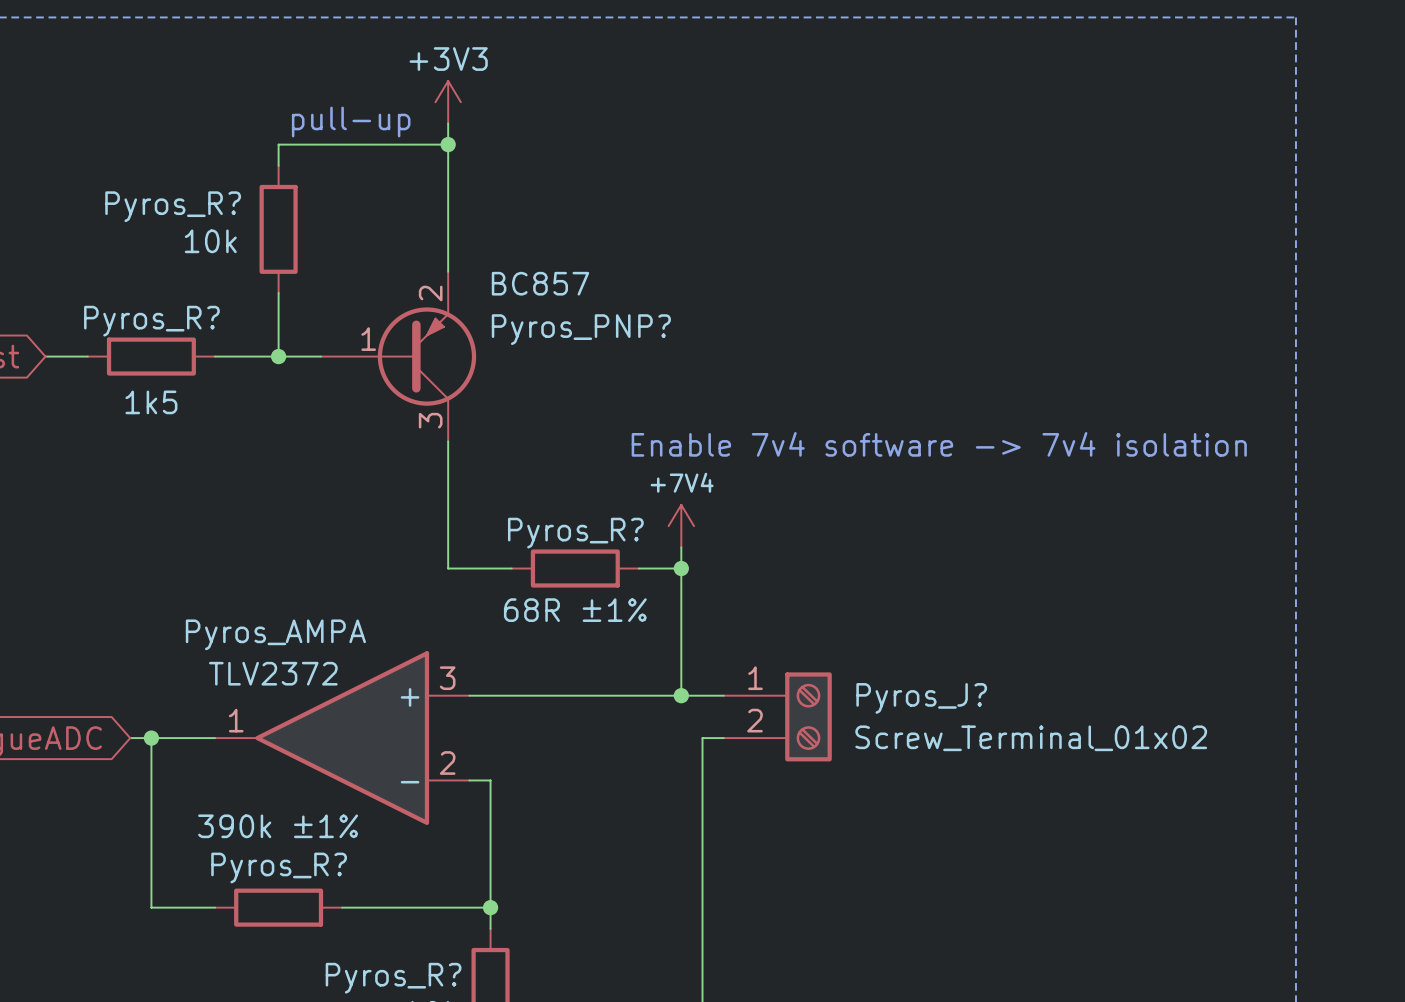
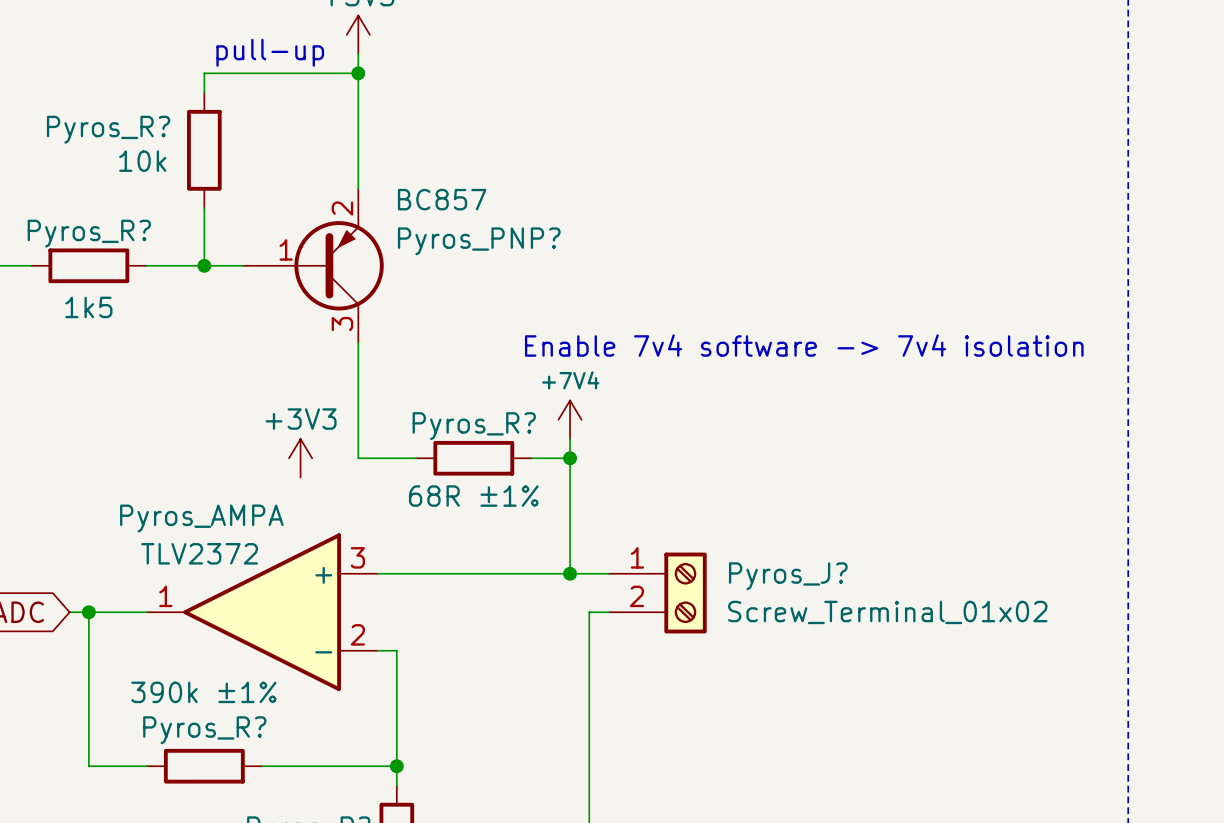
power symbol: none -> +3V3 (300, 458)

